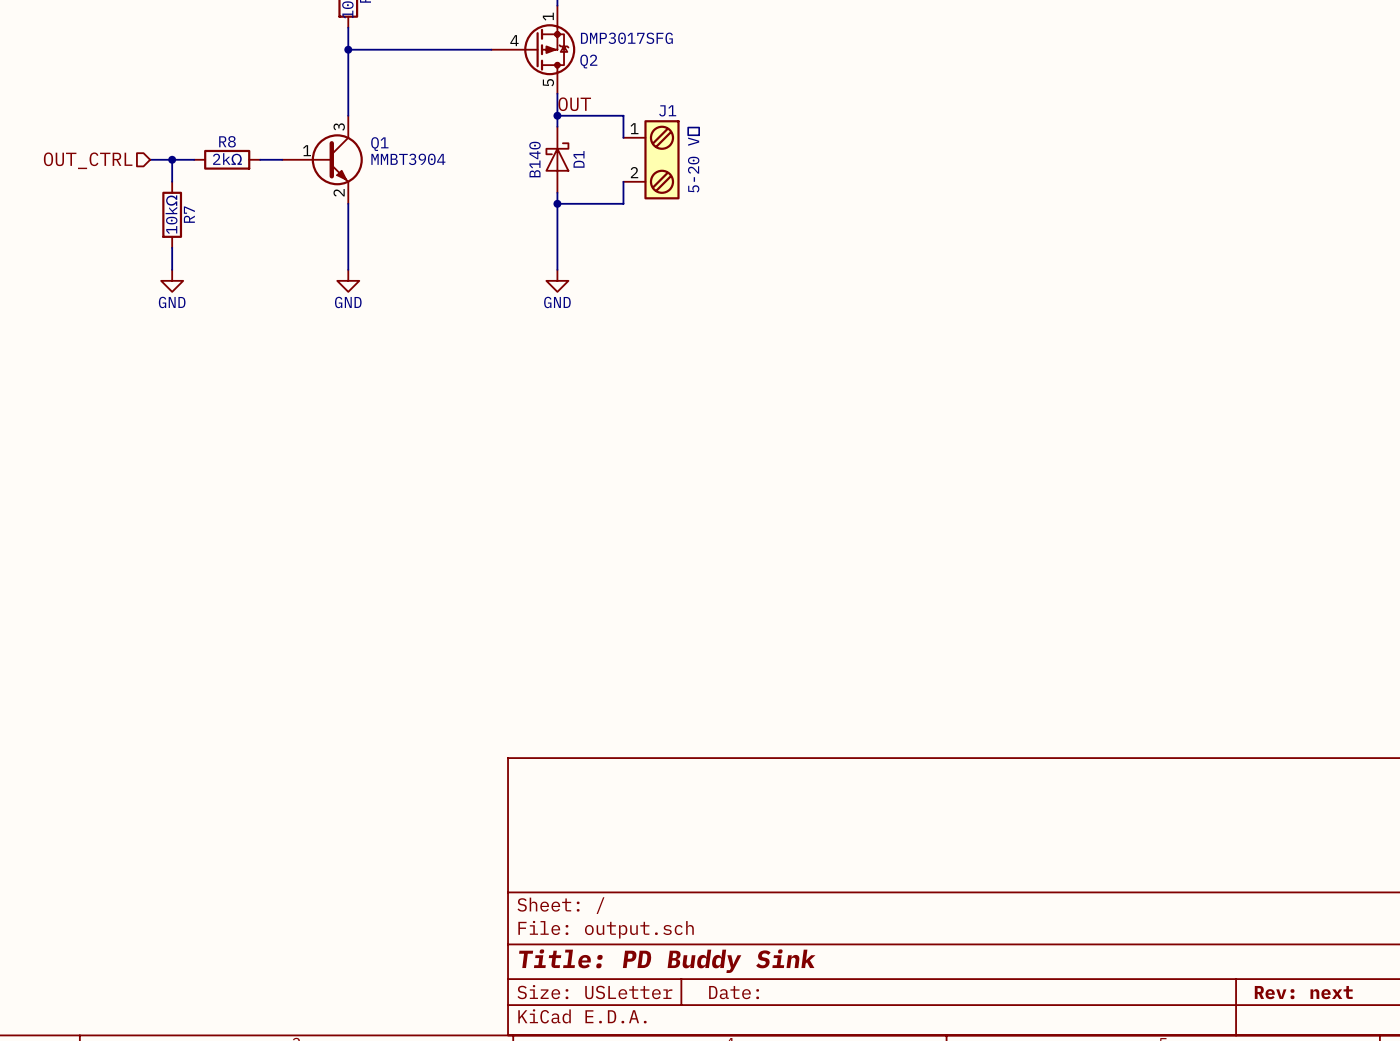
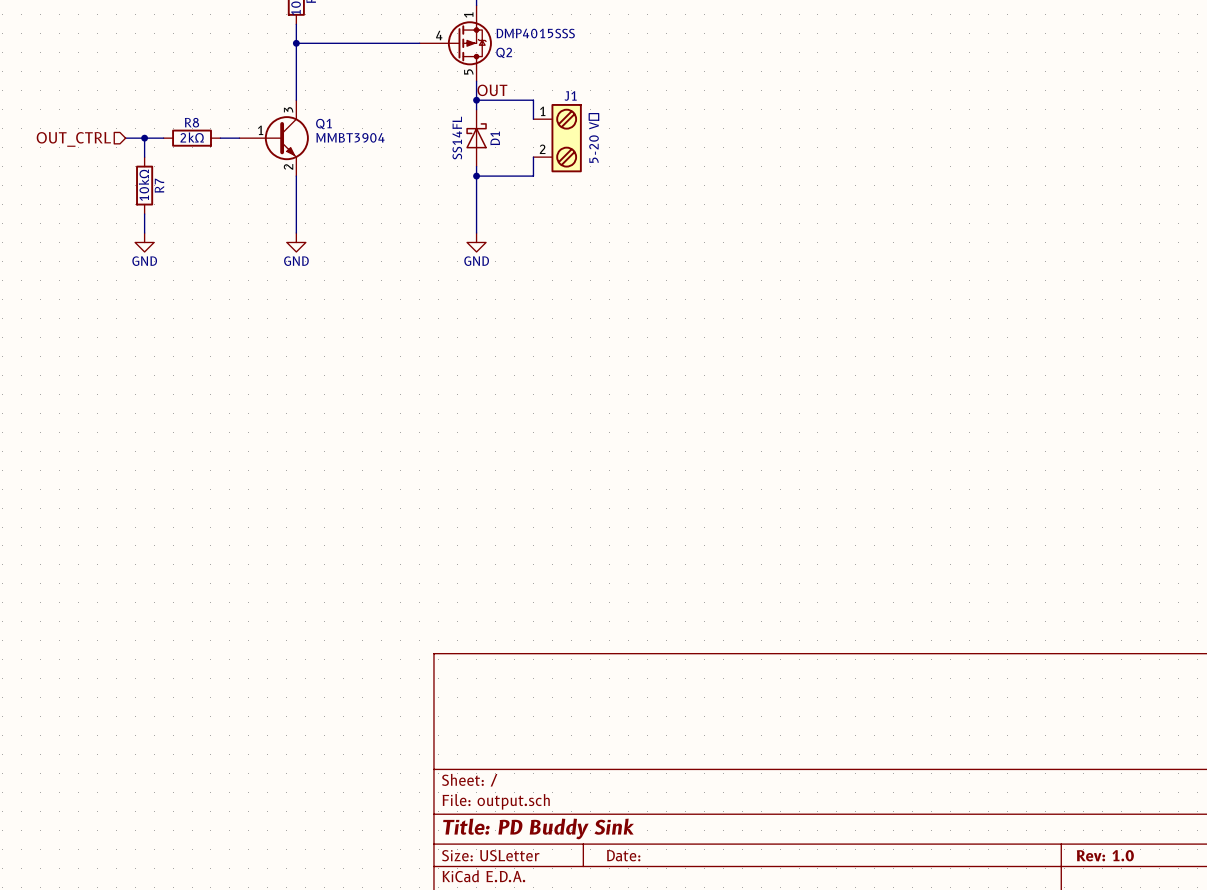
Q2 value: DMP3017SFG (626, 38) -> DMP4015SSS (535, 33)
D1 value: B140 (534, 159) -> SS14FL (457, 138)
title block: Rev: next (1303, 992) -> Rev: 1.0 (1105, 855)

